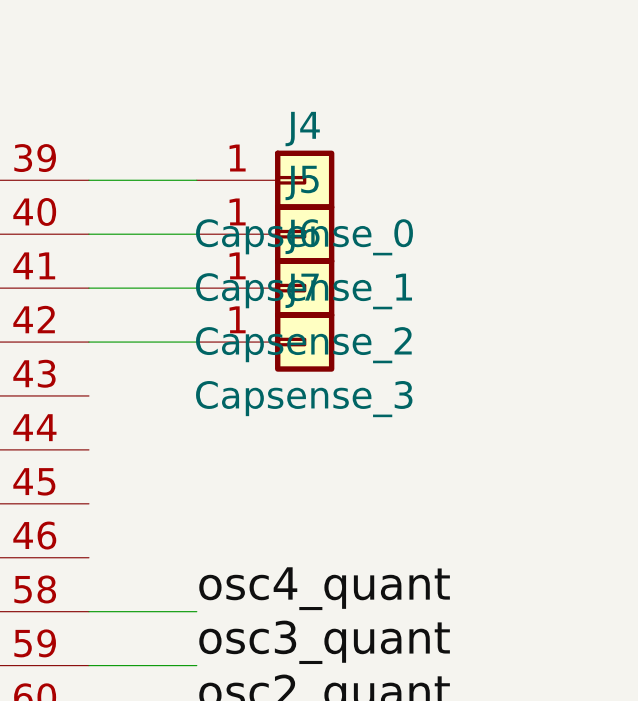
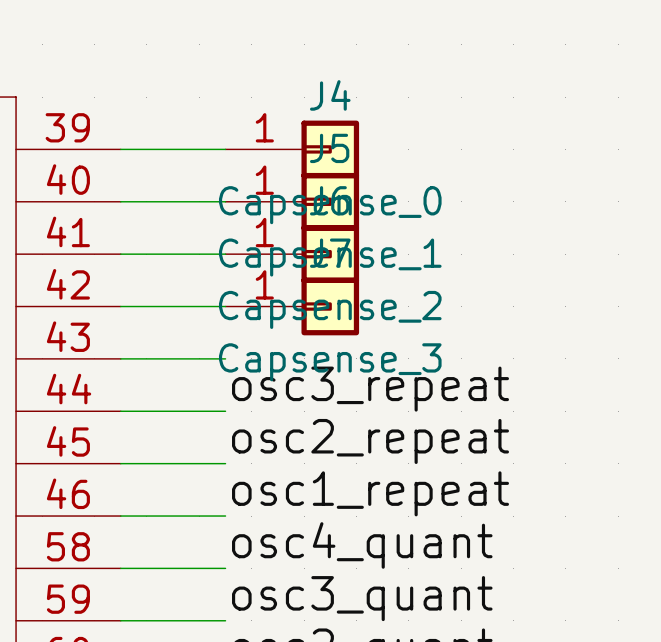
wire: none -> (120, 358) (225, 358)
label: none -> osc3_repeat (370, 389)
wire: none -> (120, 411) (225, 411)
label: none -> osc2_repeat (370, 441)
wire: none -> (120, 463) (225, 463)
label: none -> osc1_repeat (370, 493)
wire: none -> (120, 516) (225, 516)

